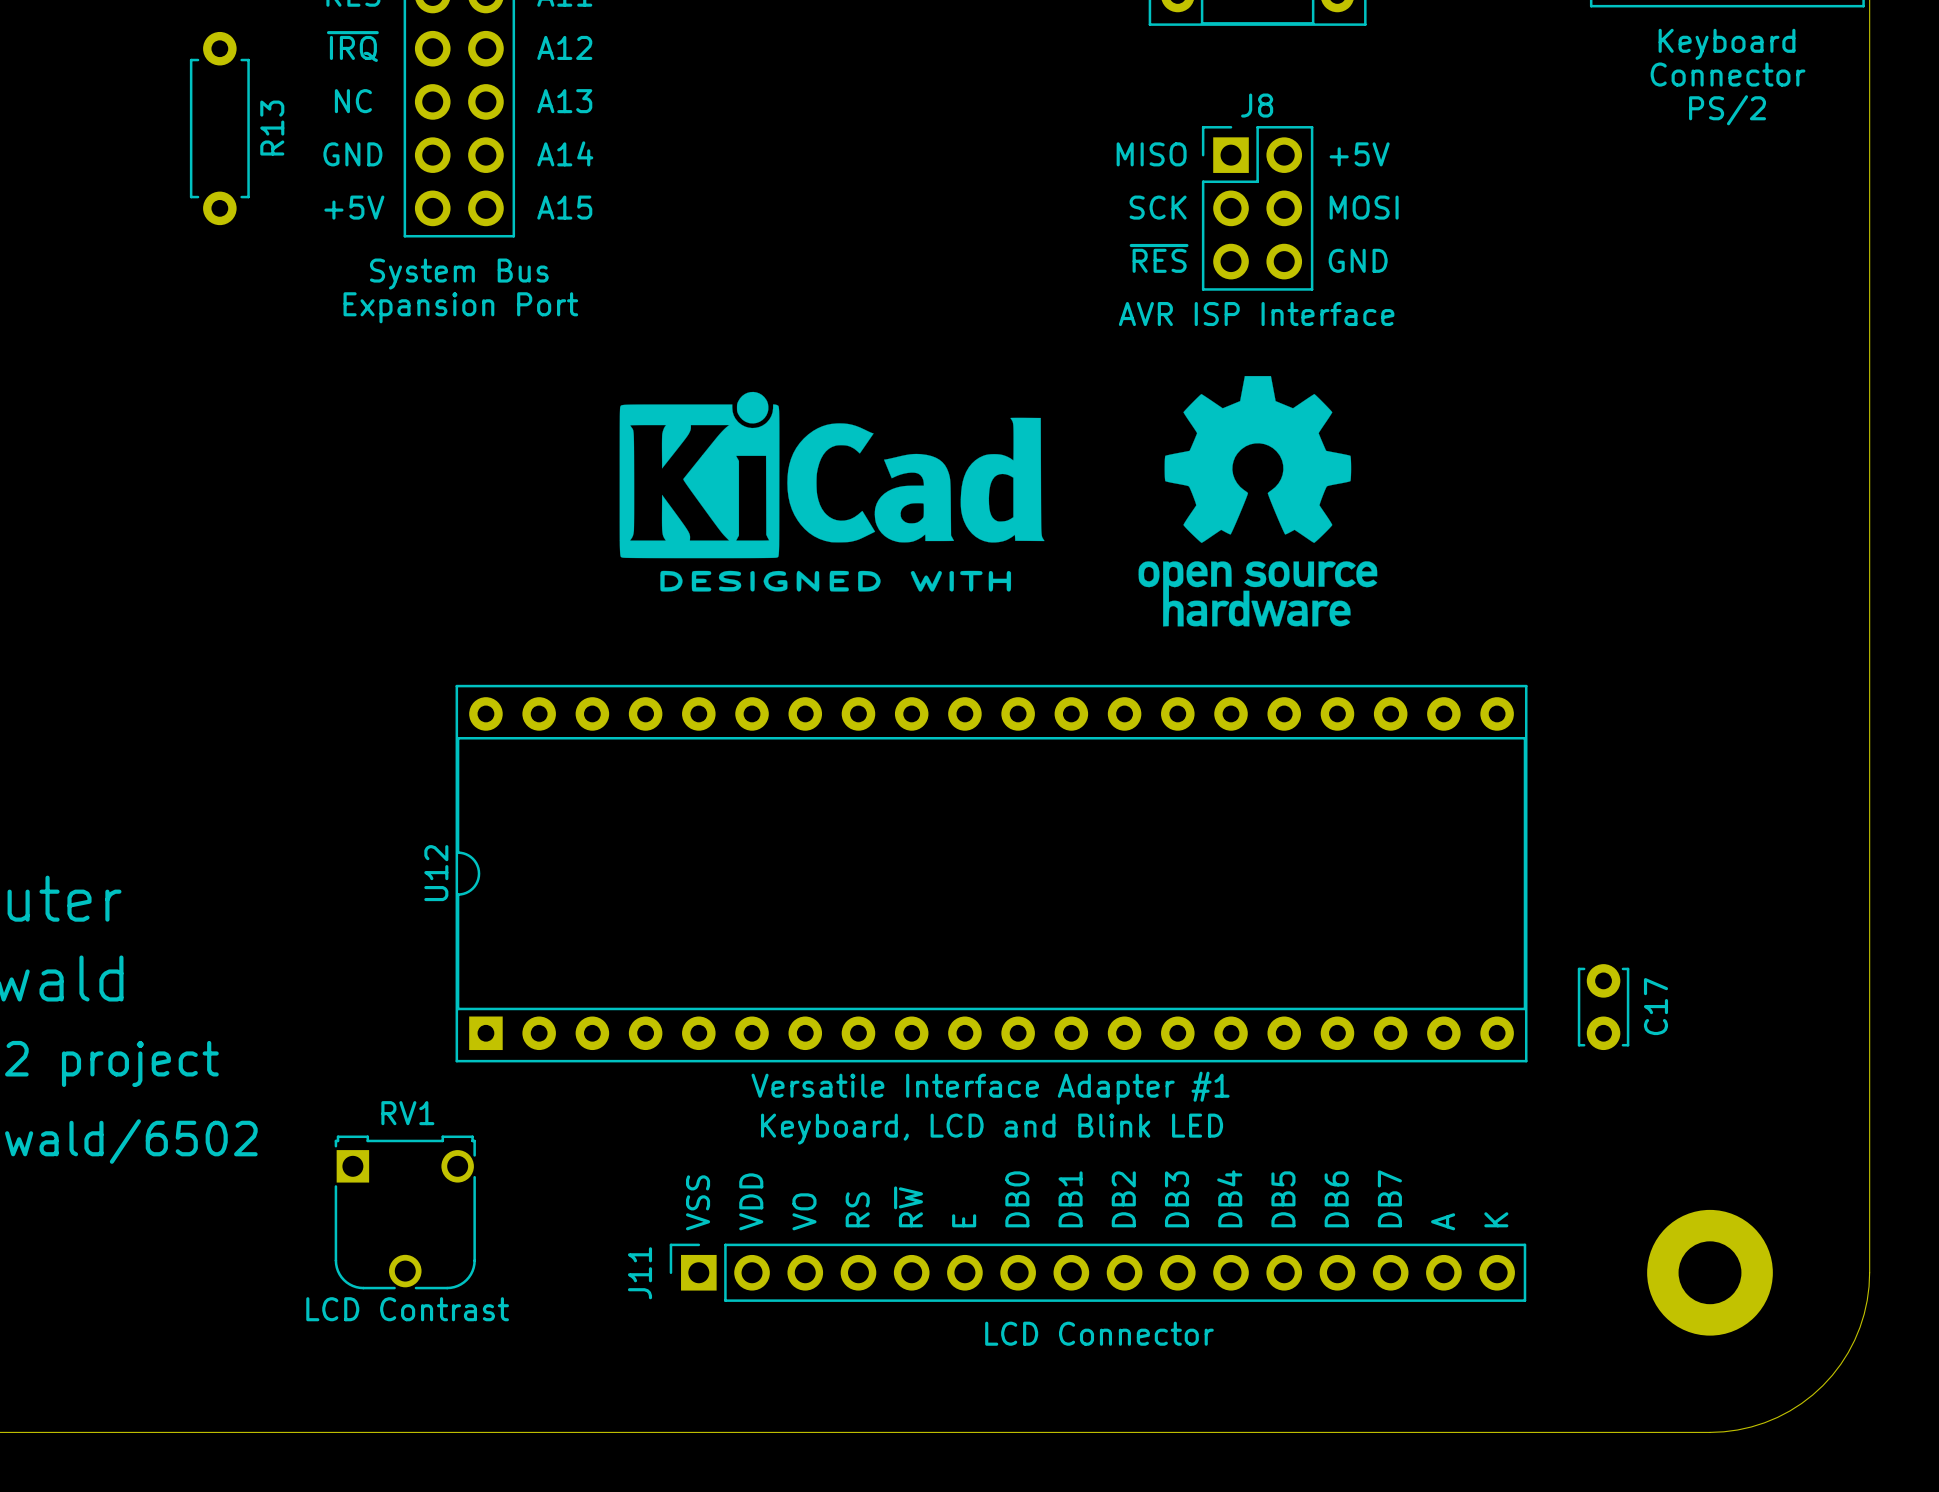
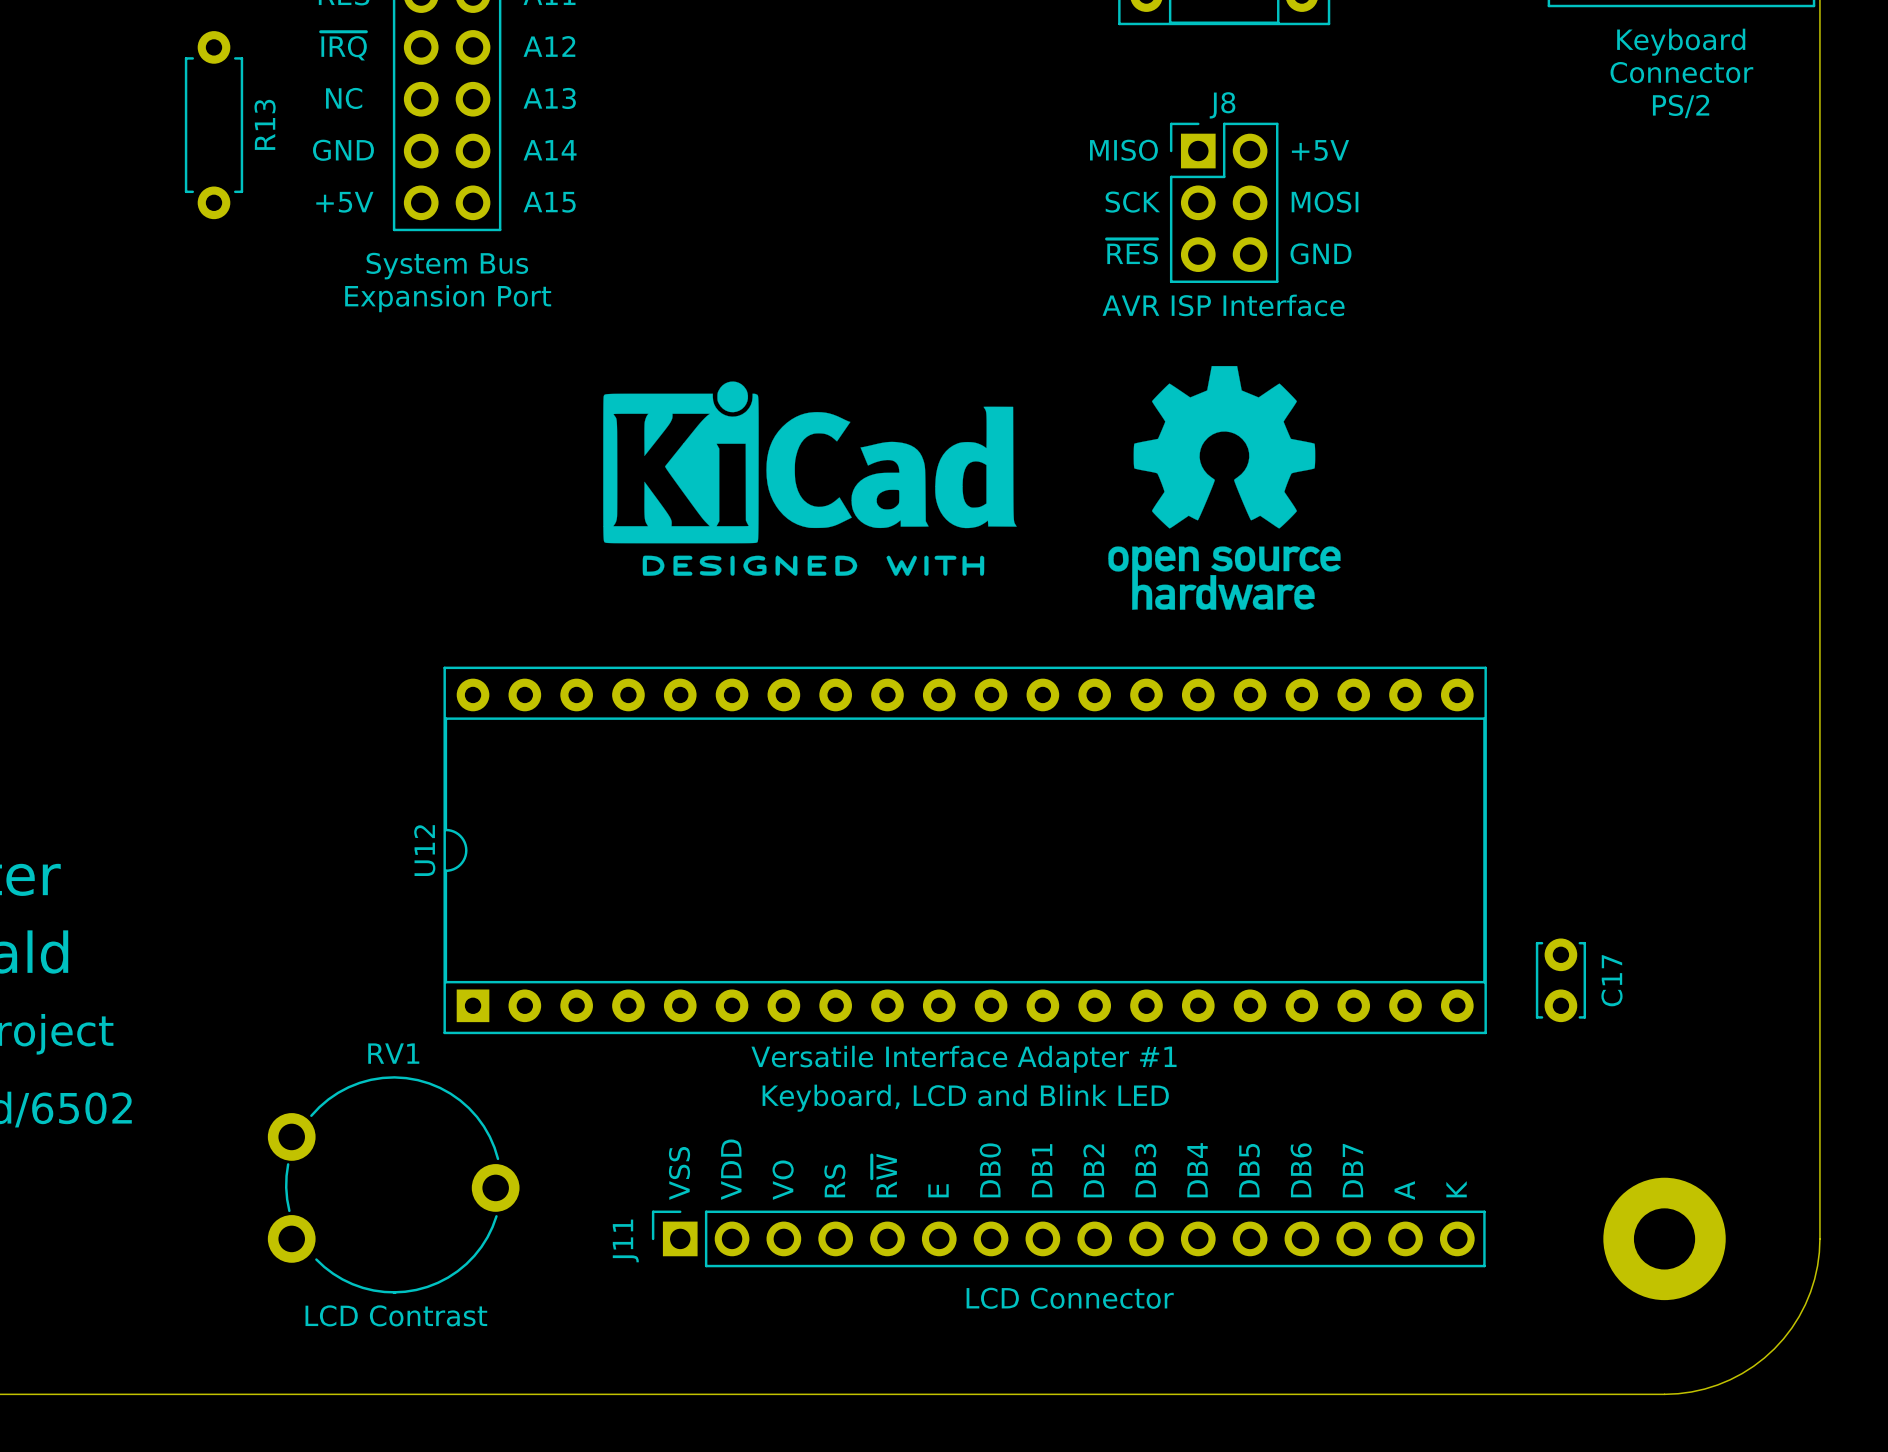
RV1 footprint: [334, 1135, 476, 1290] -> [267, 1076, 520, 1294]
text position: LCD Contrast (407, 1309) -> LCD Contrast (396, 1315)

